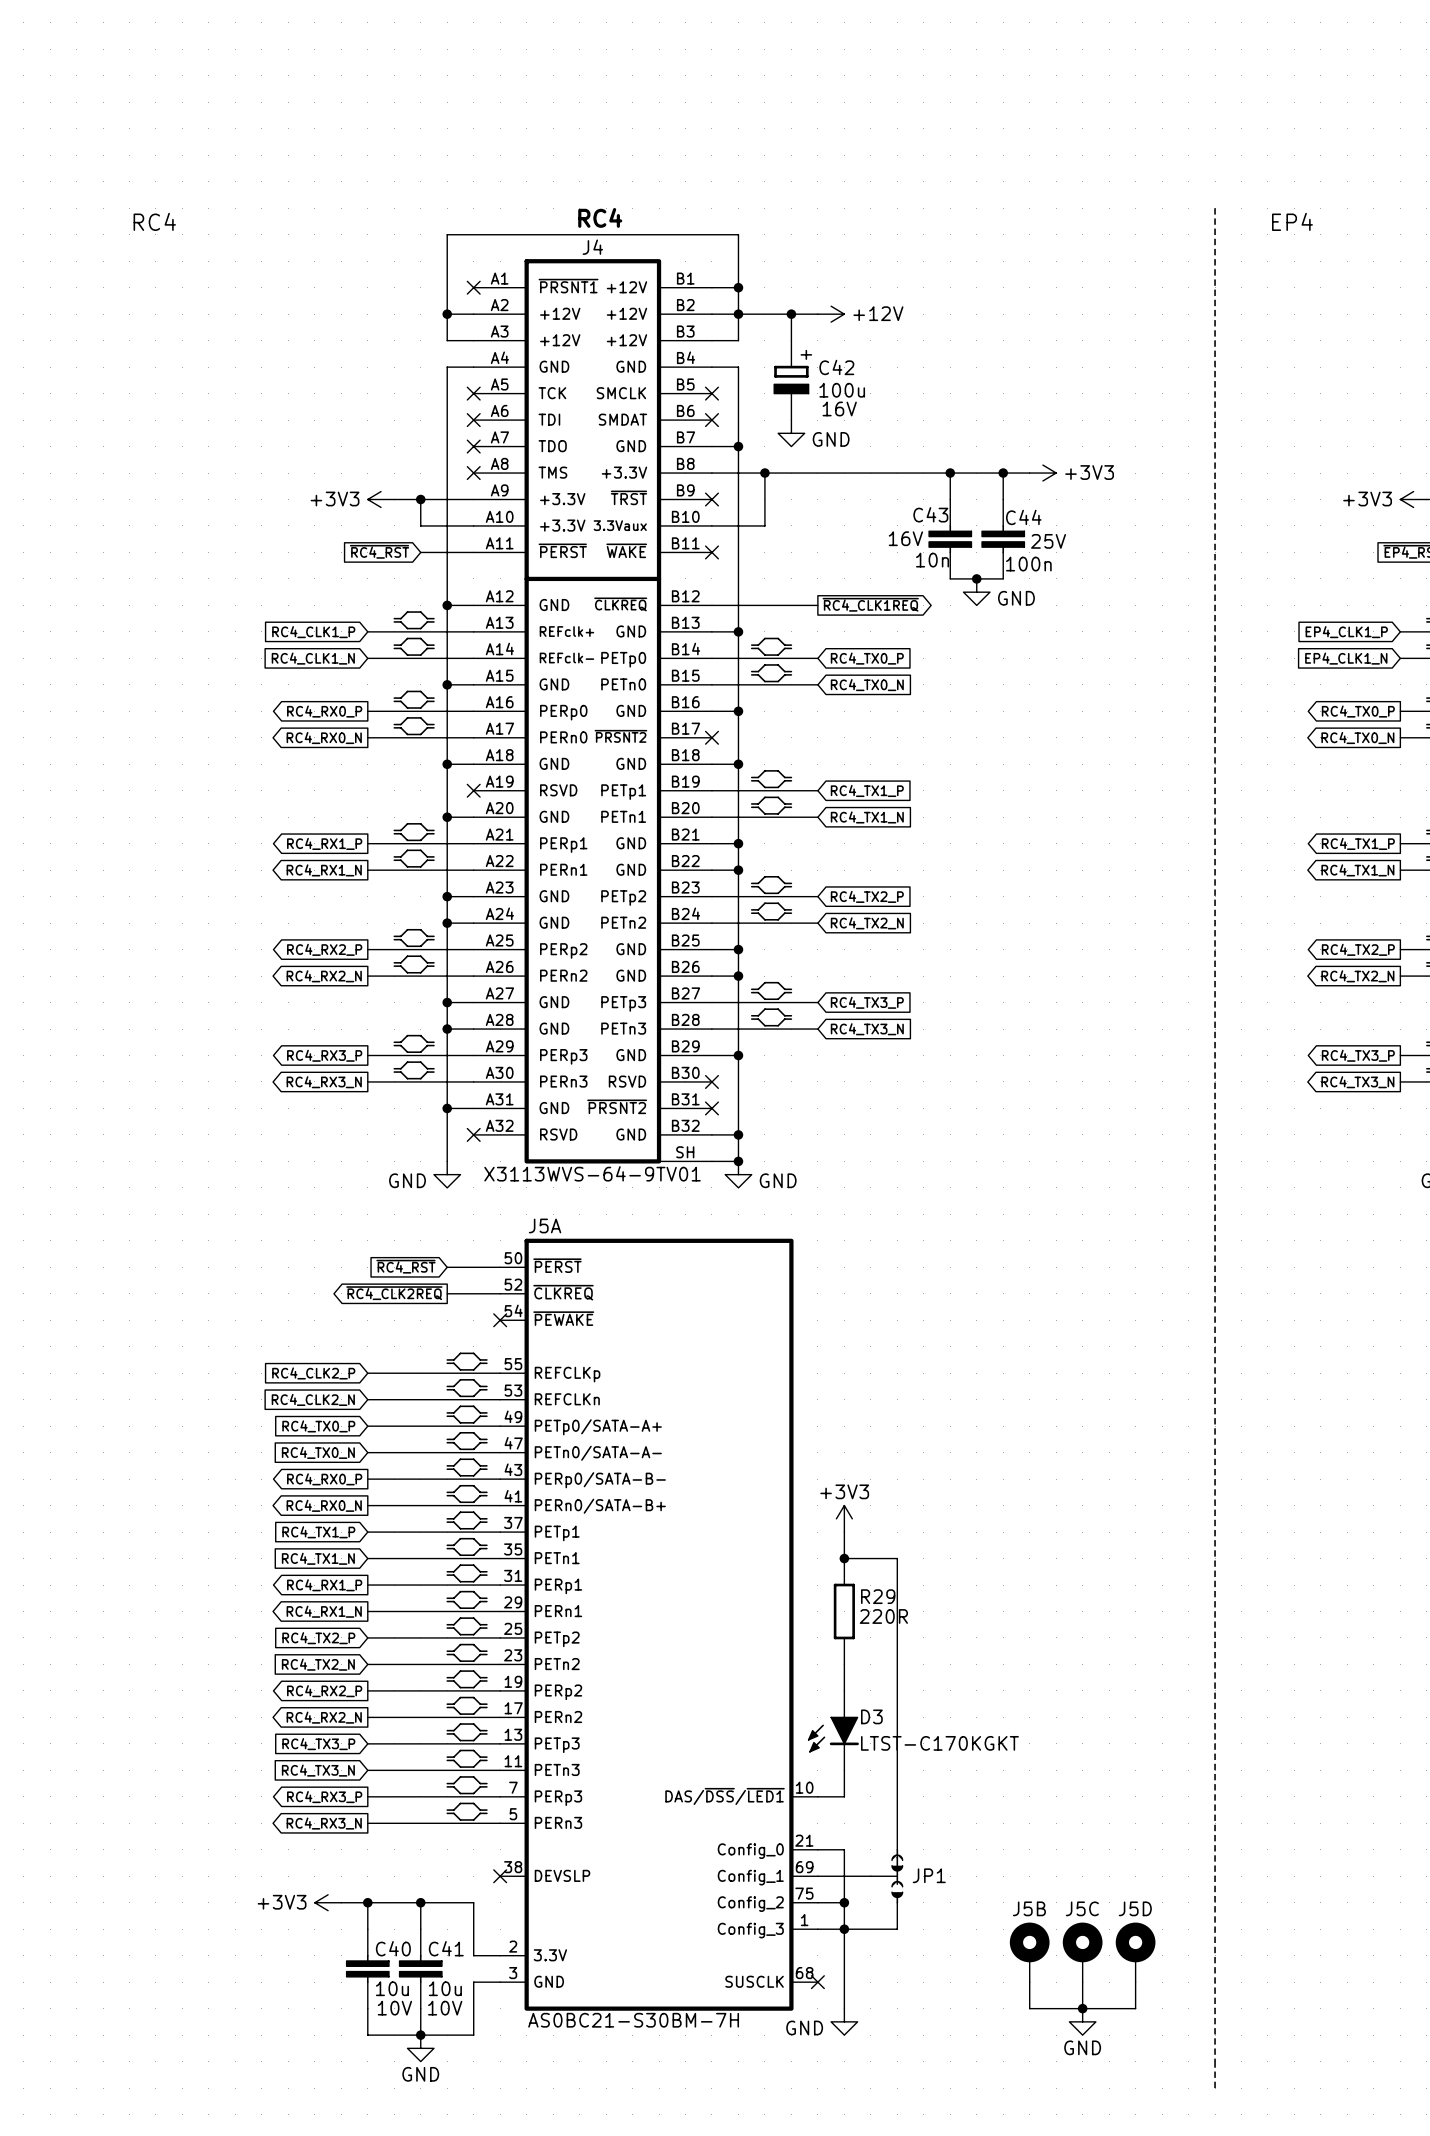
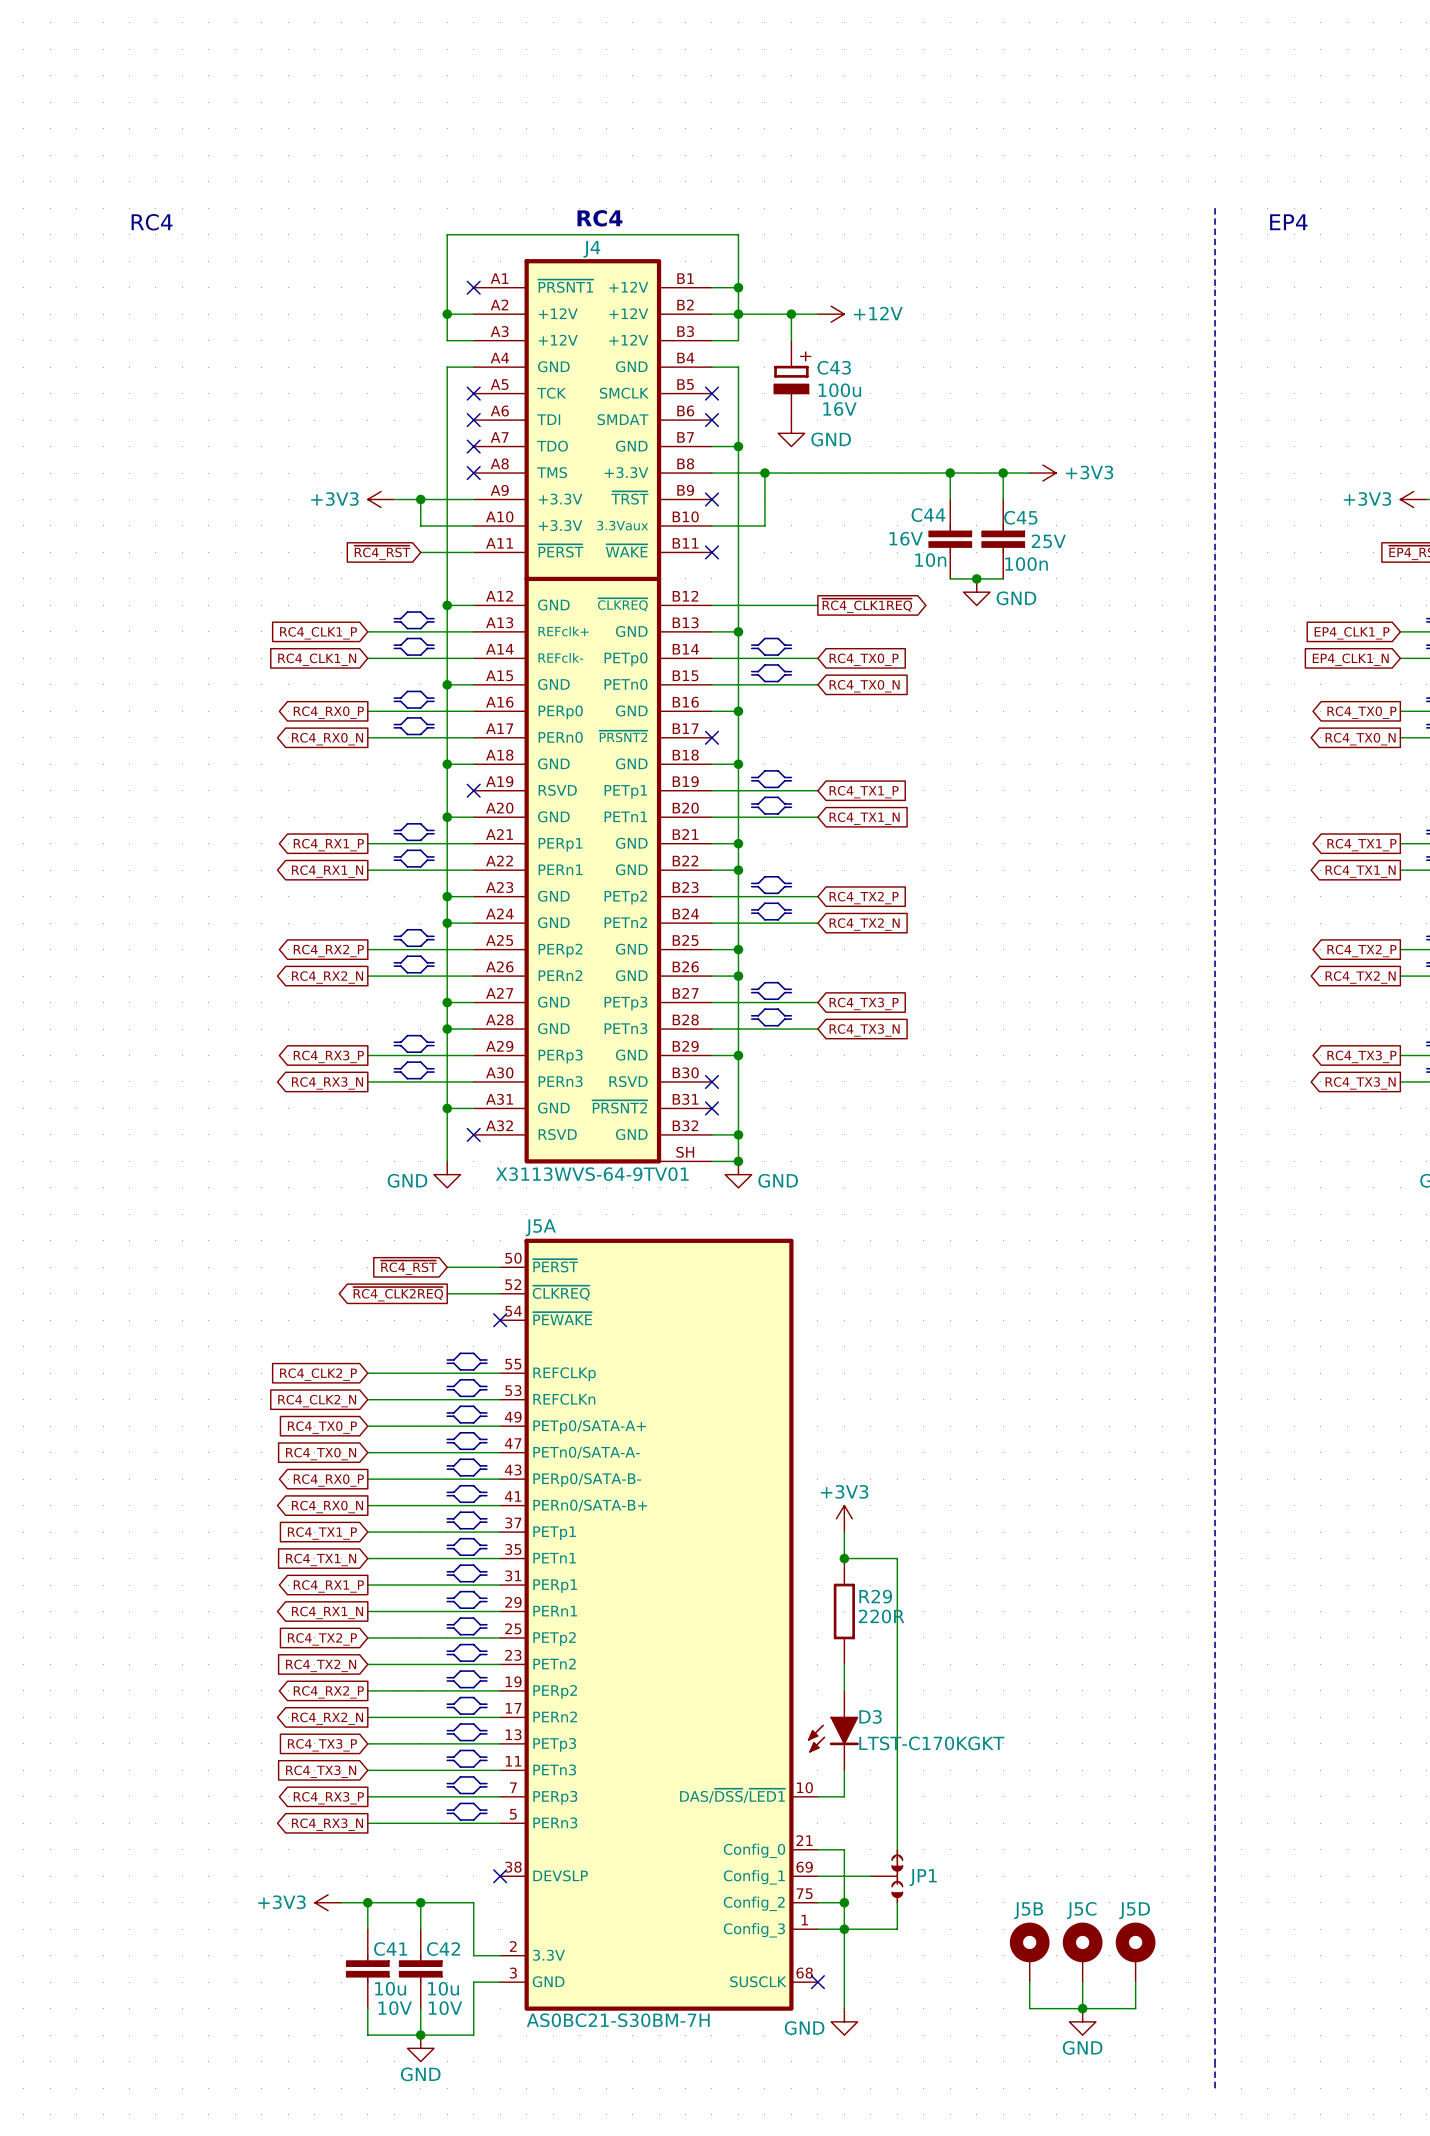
C42 name: C42 (836, 367) -> C43 (834, 367)
C43 name: C43 (930, 514) -> C44 (928, 515)
C44 name: C44 (1023, 517) -> C45 (1020, 517)
C40 name: C40 (393, 1948) -> C41 (390, 1949)
C41 name: C41 (446, 1948) -> C42 (443, 1949)

